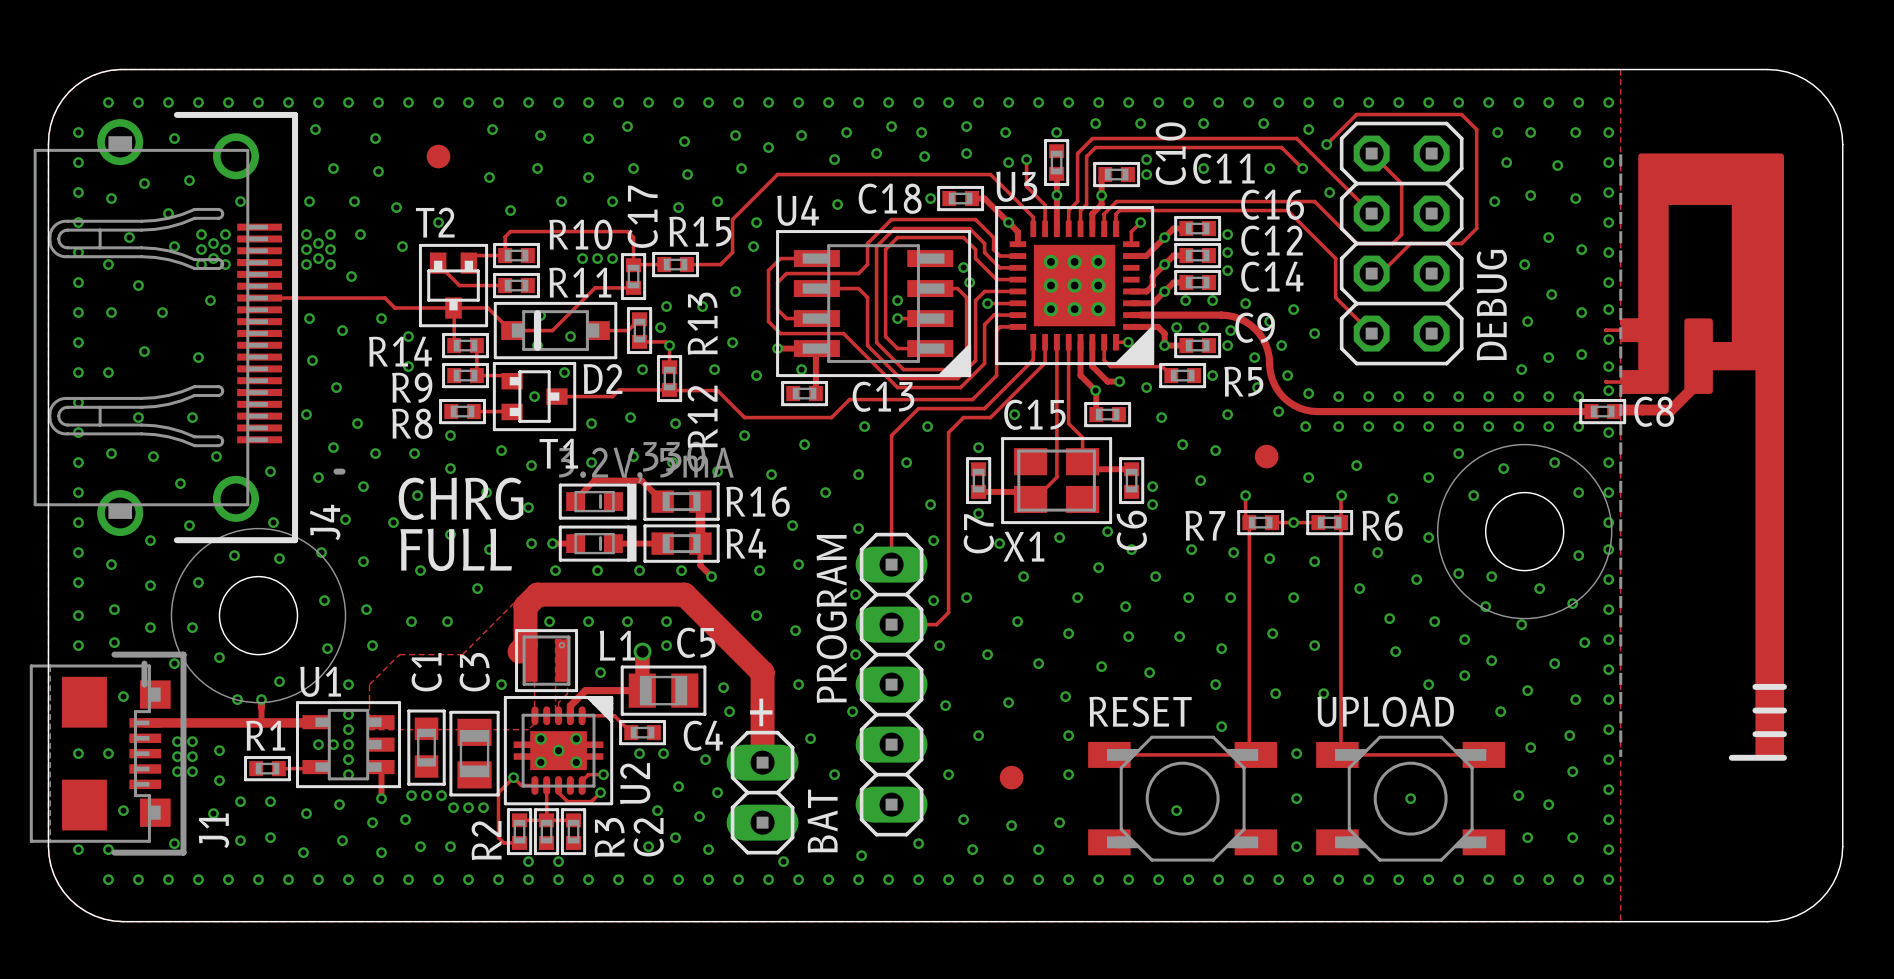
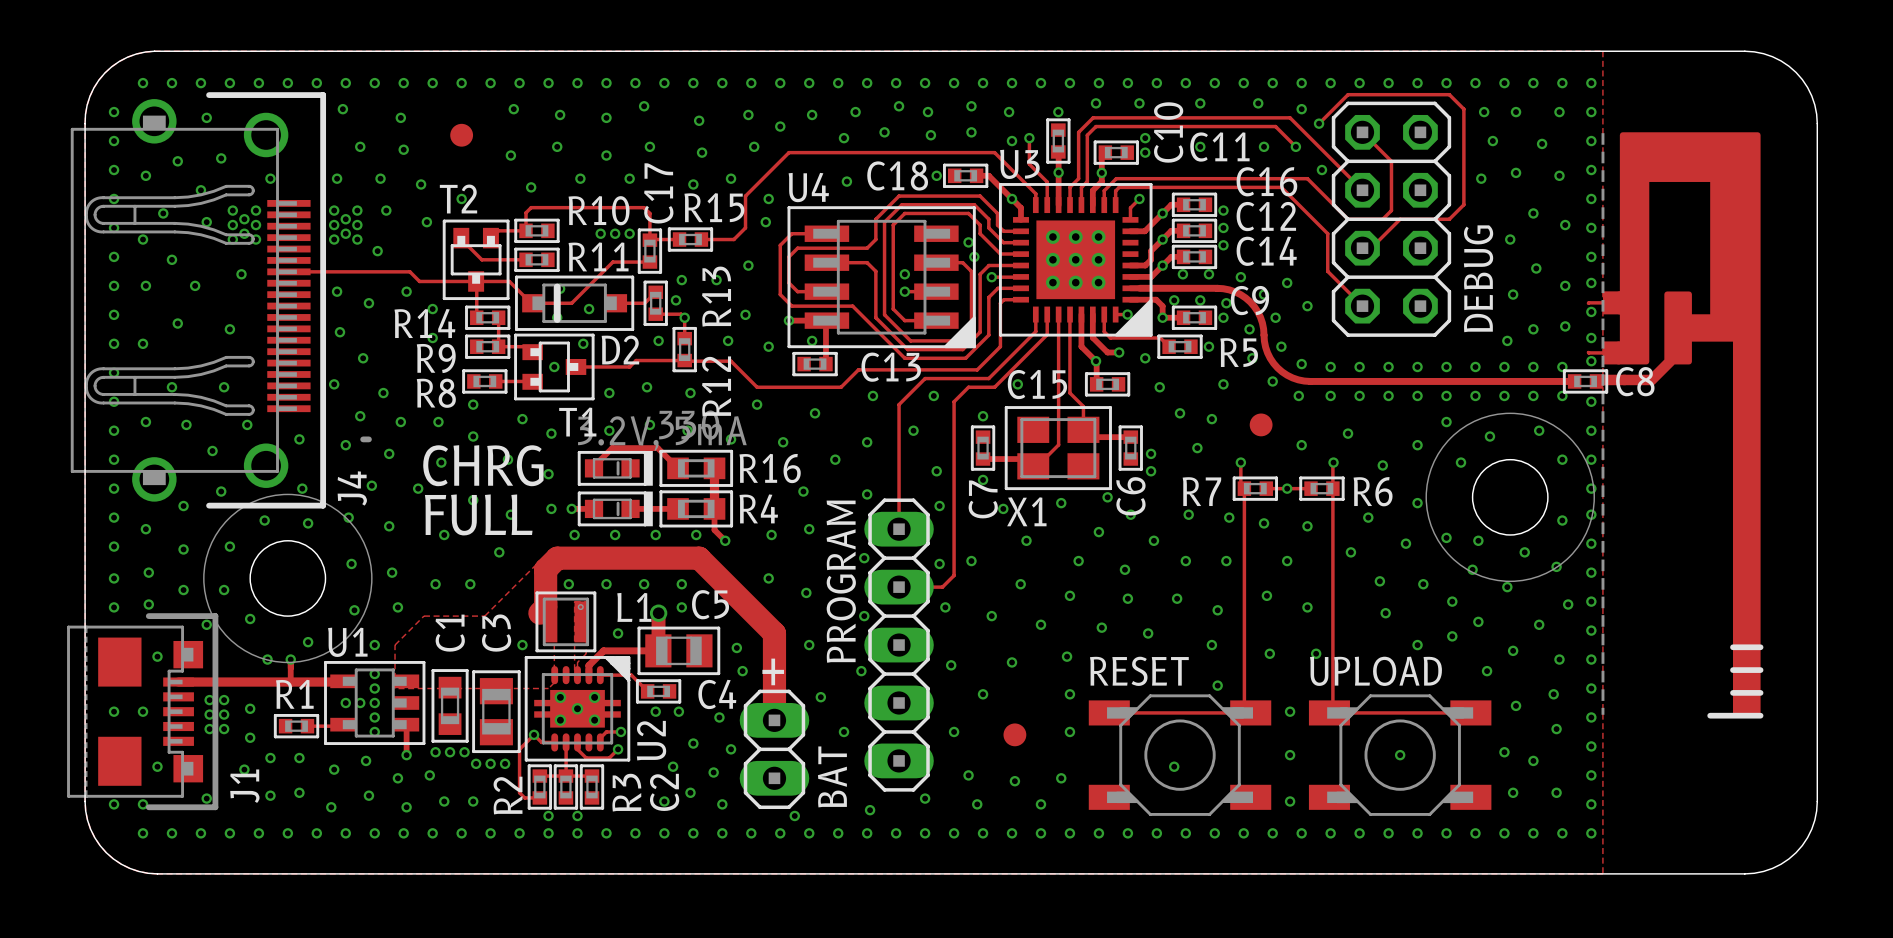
line: (144, 663) (144, 684) -> none

